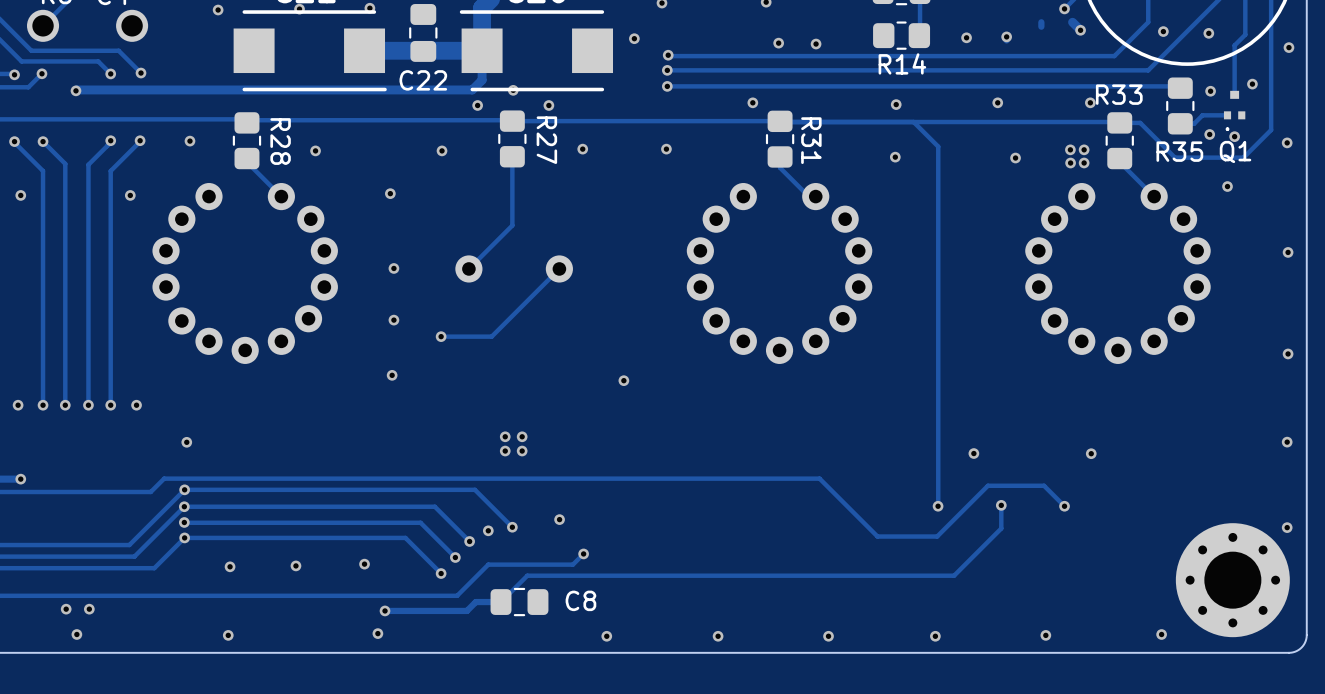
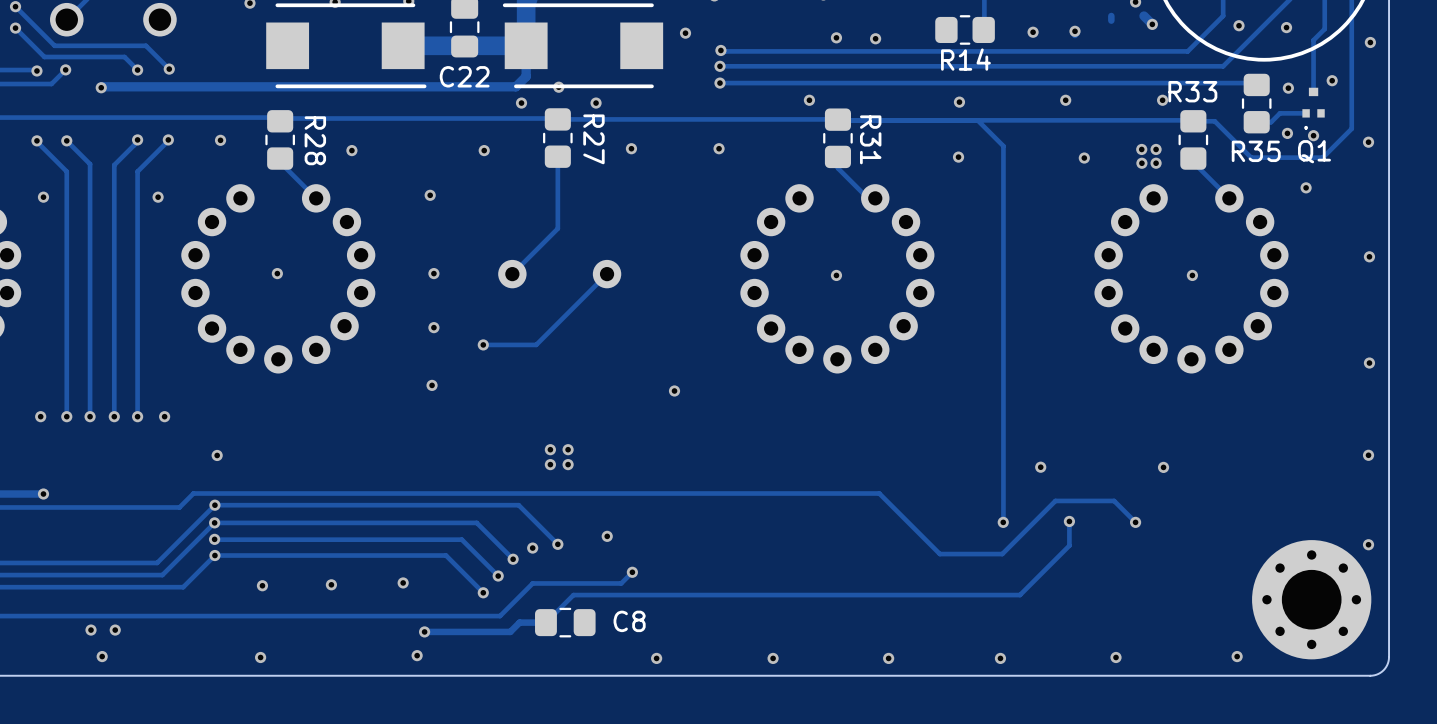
via: none -> (277, 273)
via: none -> (836, 275)
via: none -> (1192, 275)

